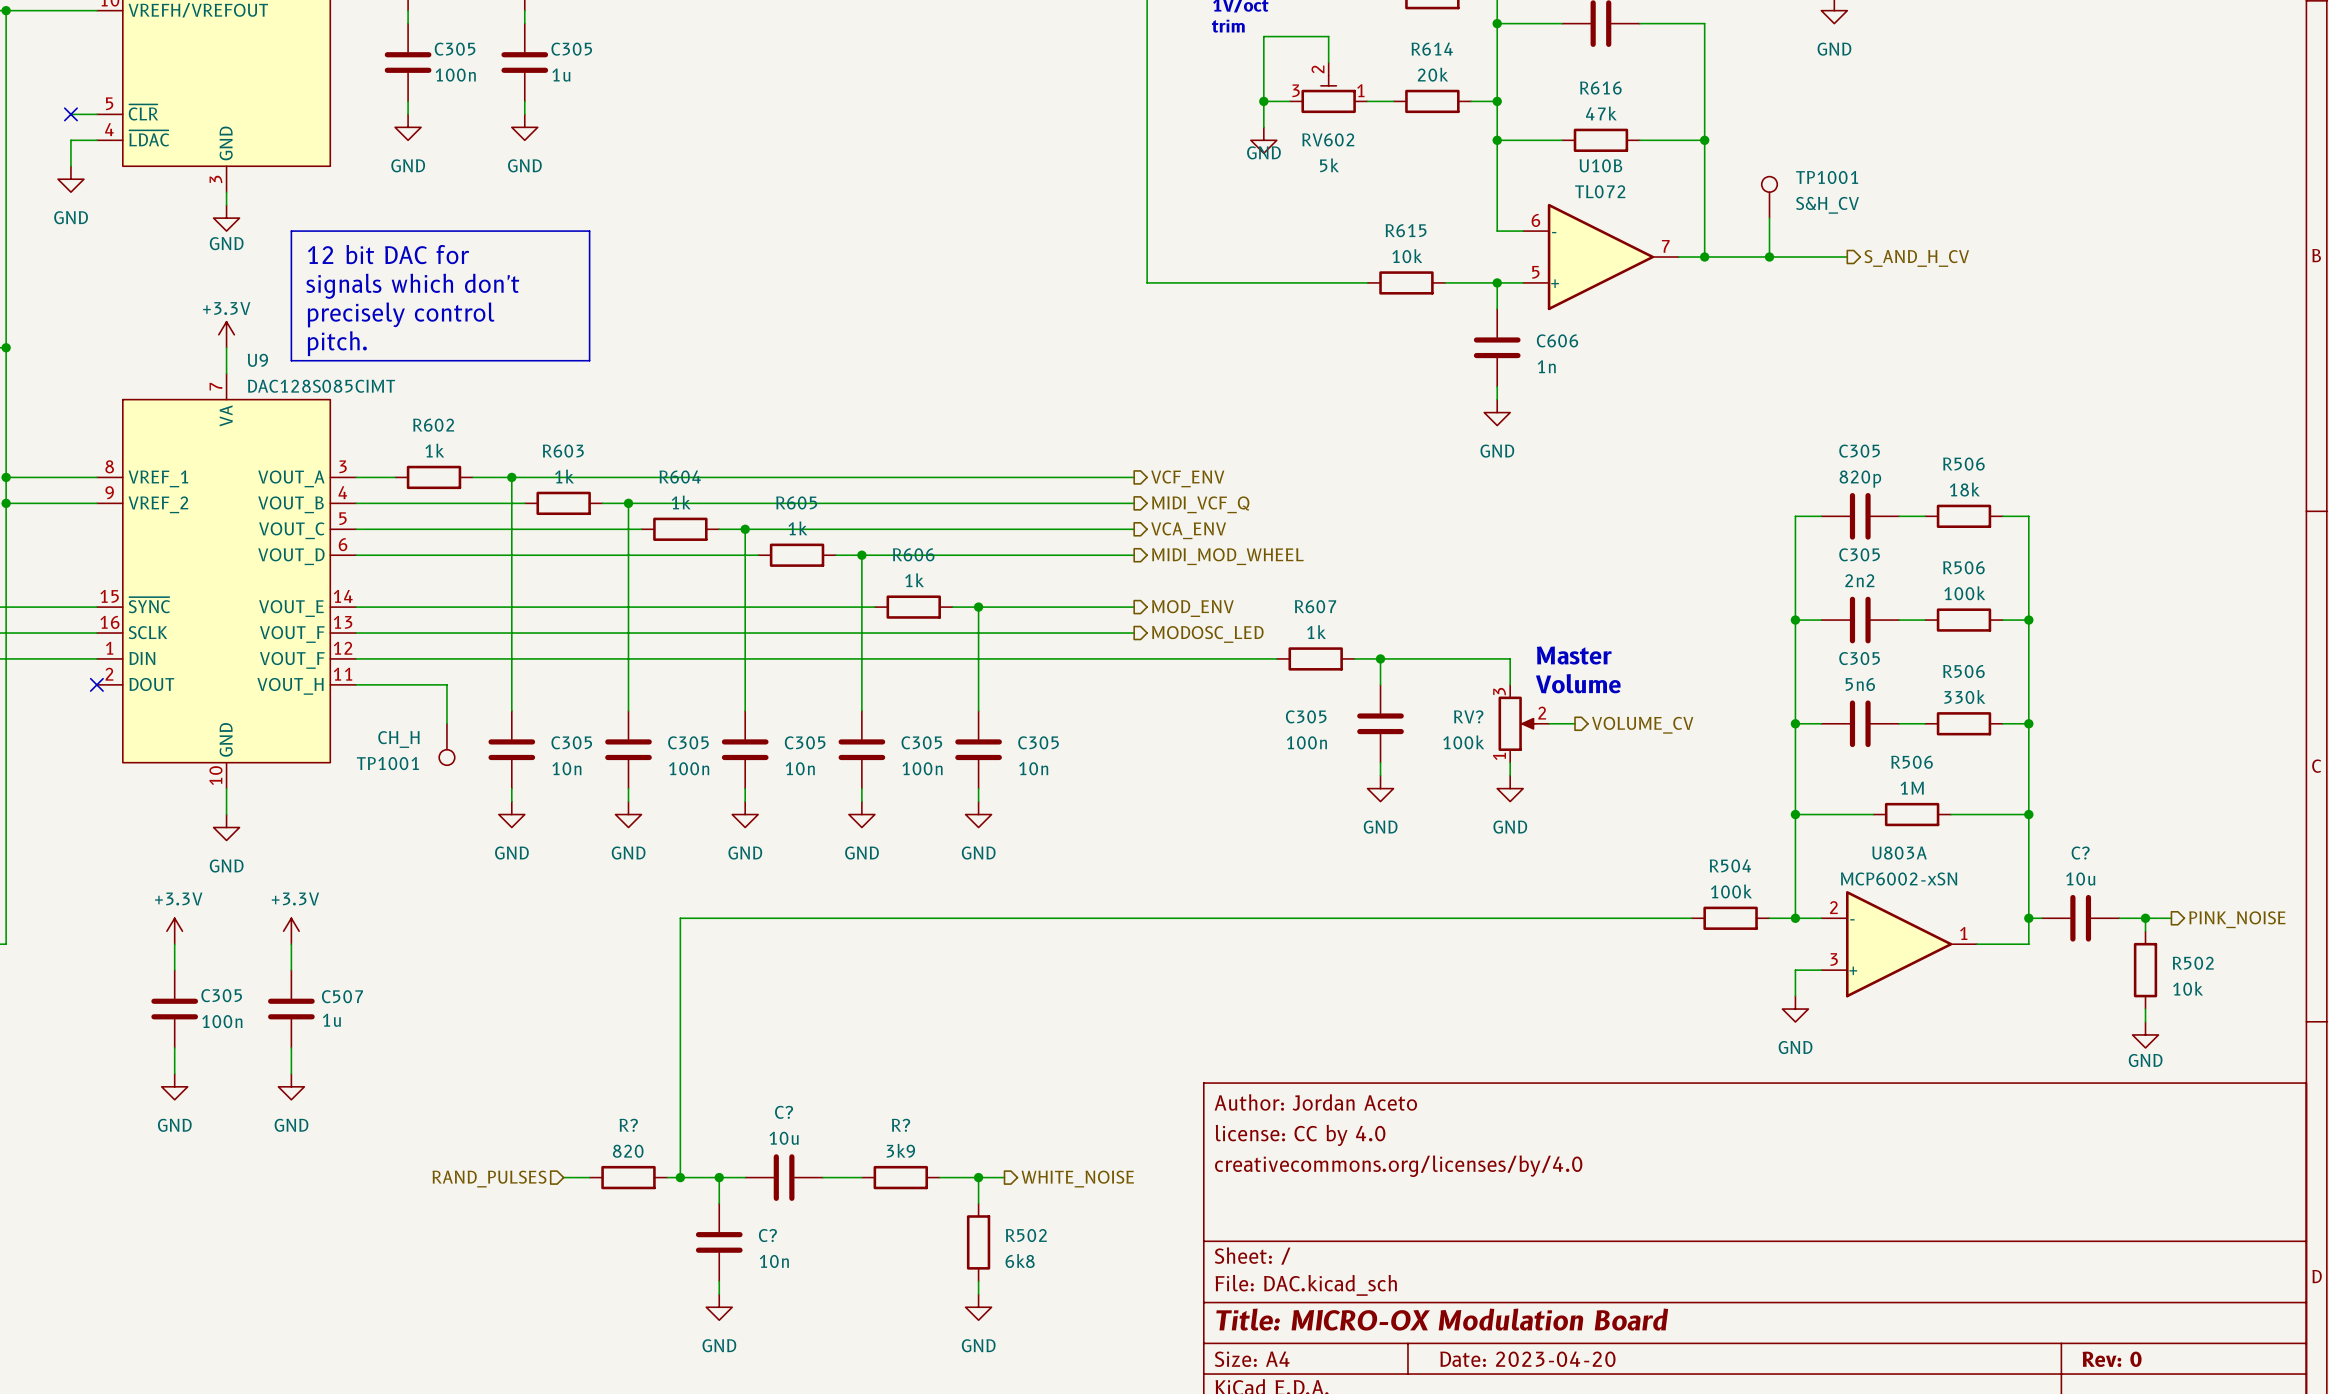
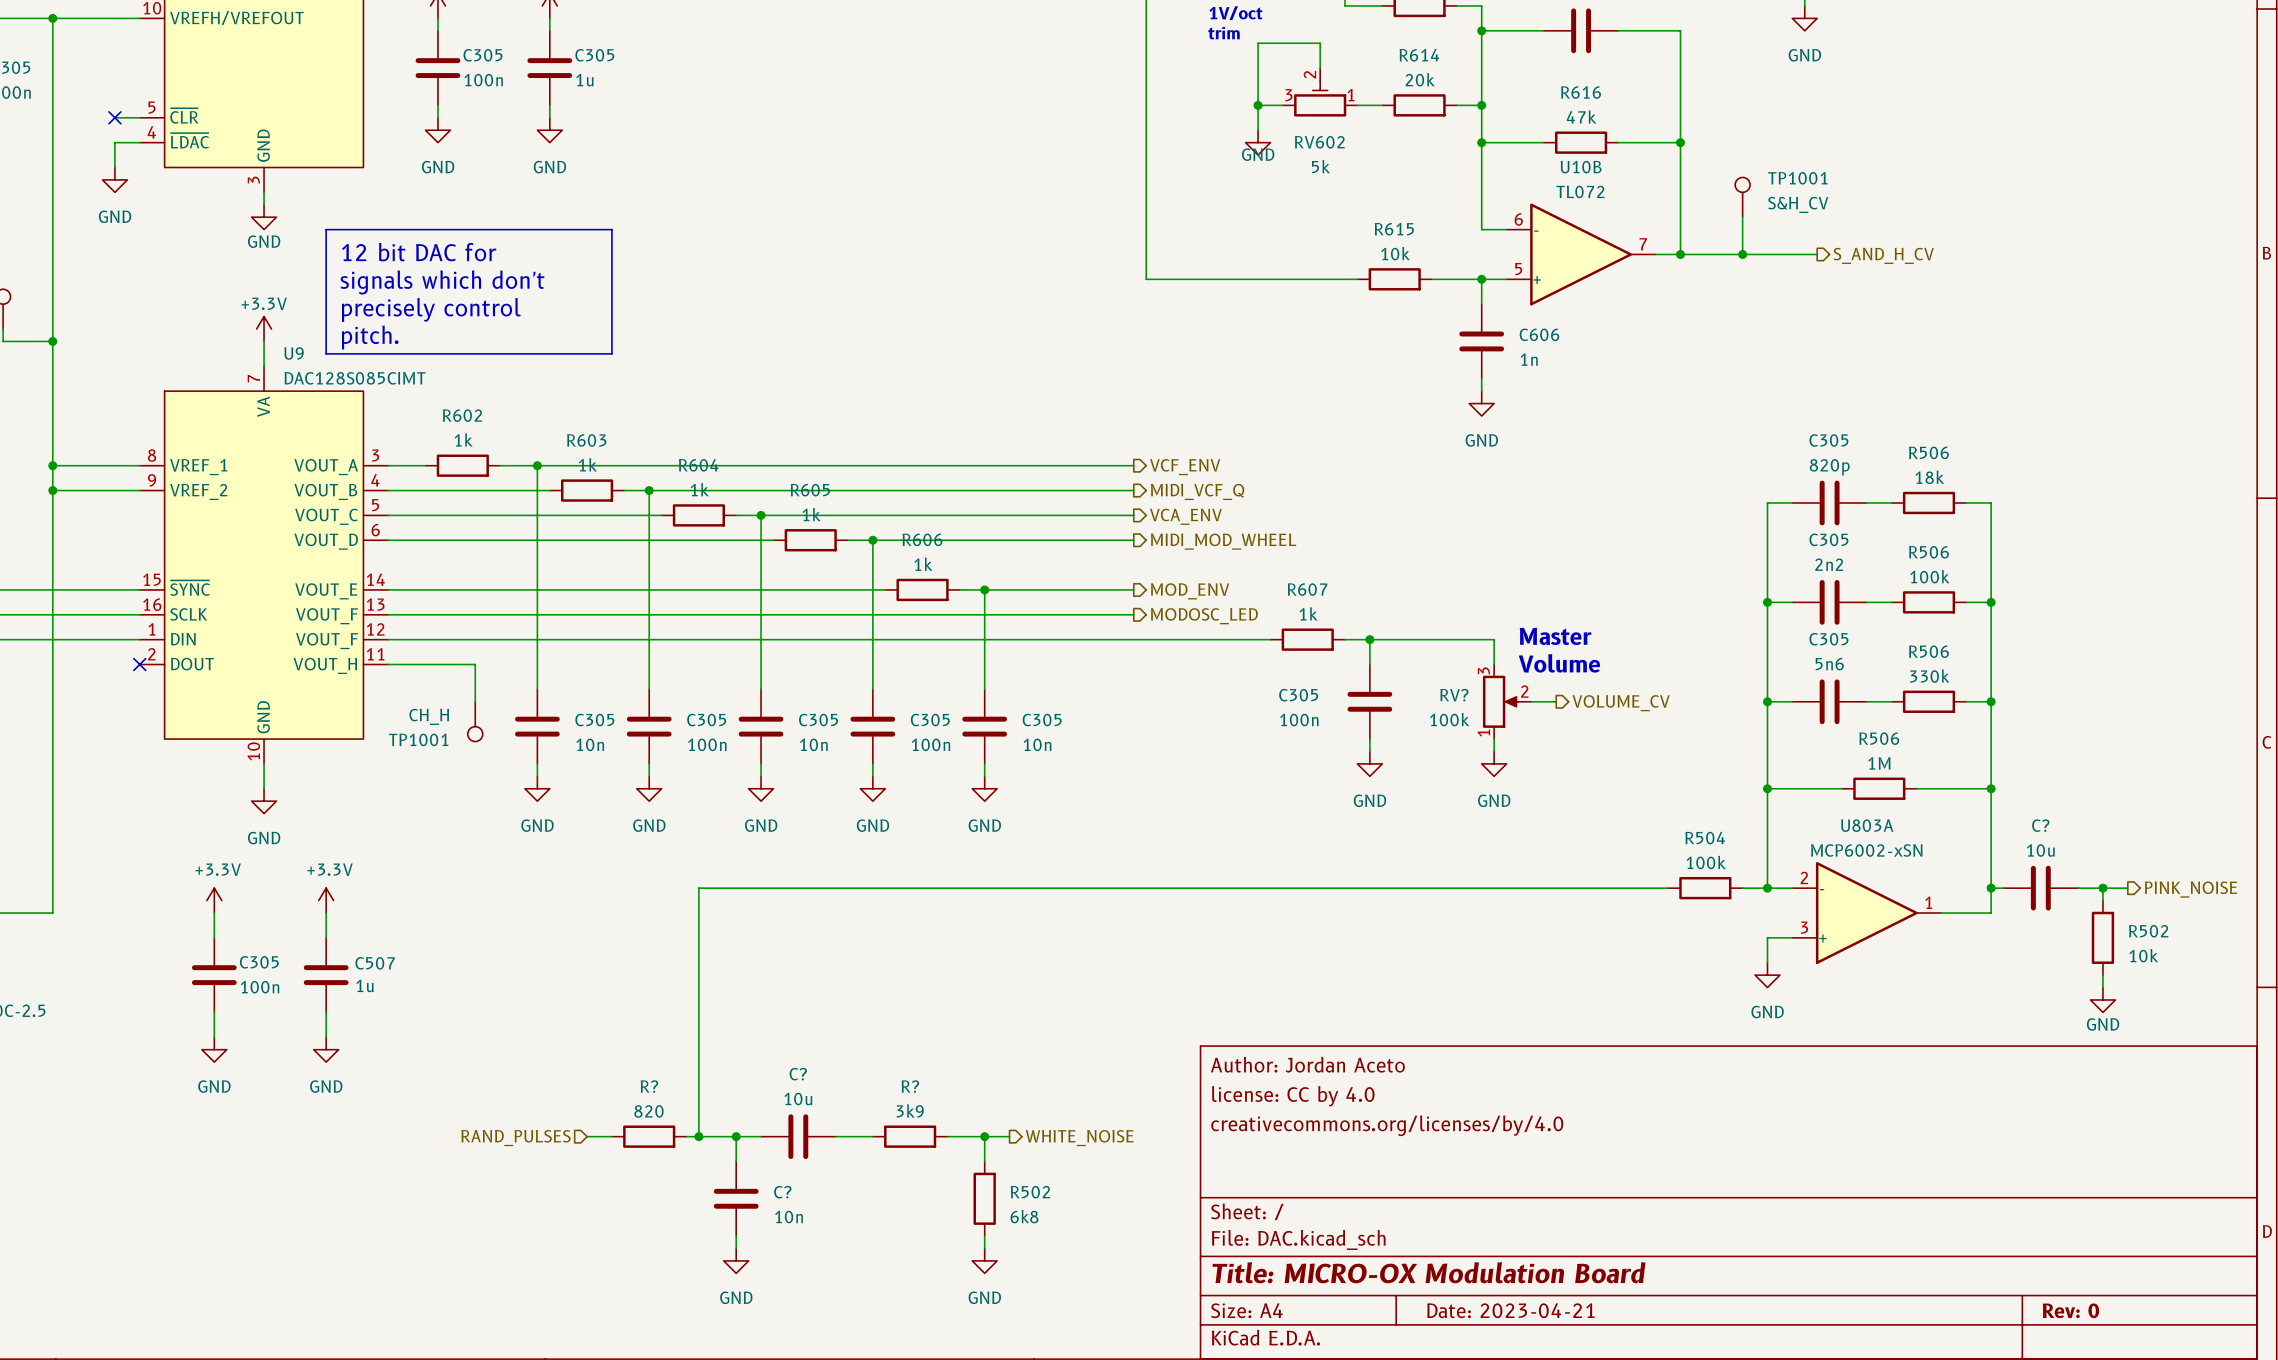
title block: Date: 2023-04-20 (1527, 1359) -> Date: 2023-04-21 (1510, 1310)

